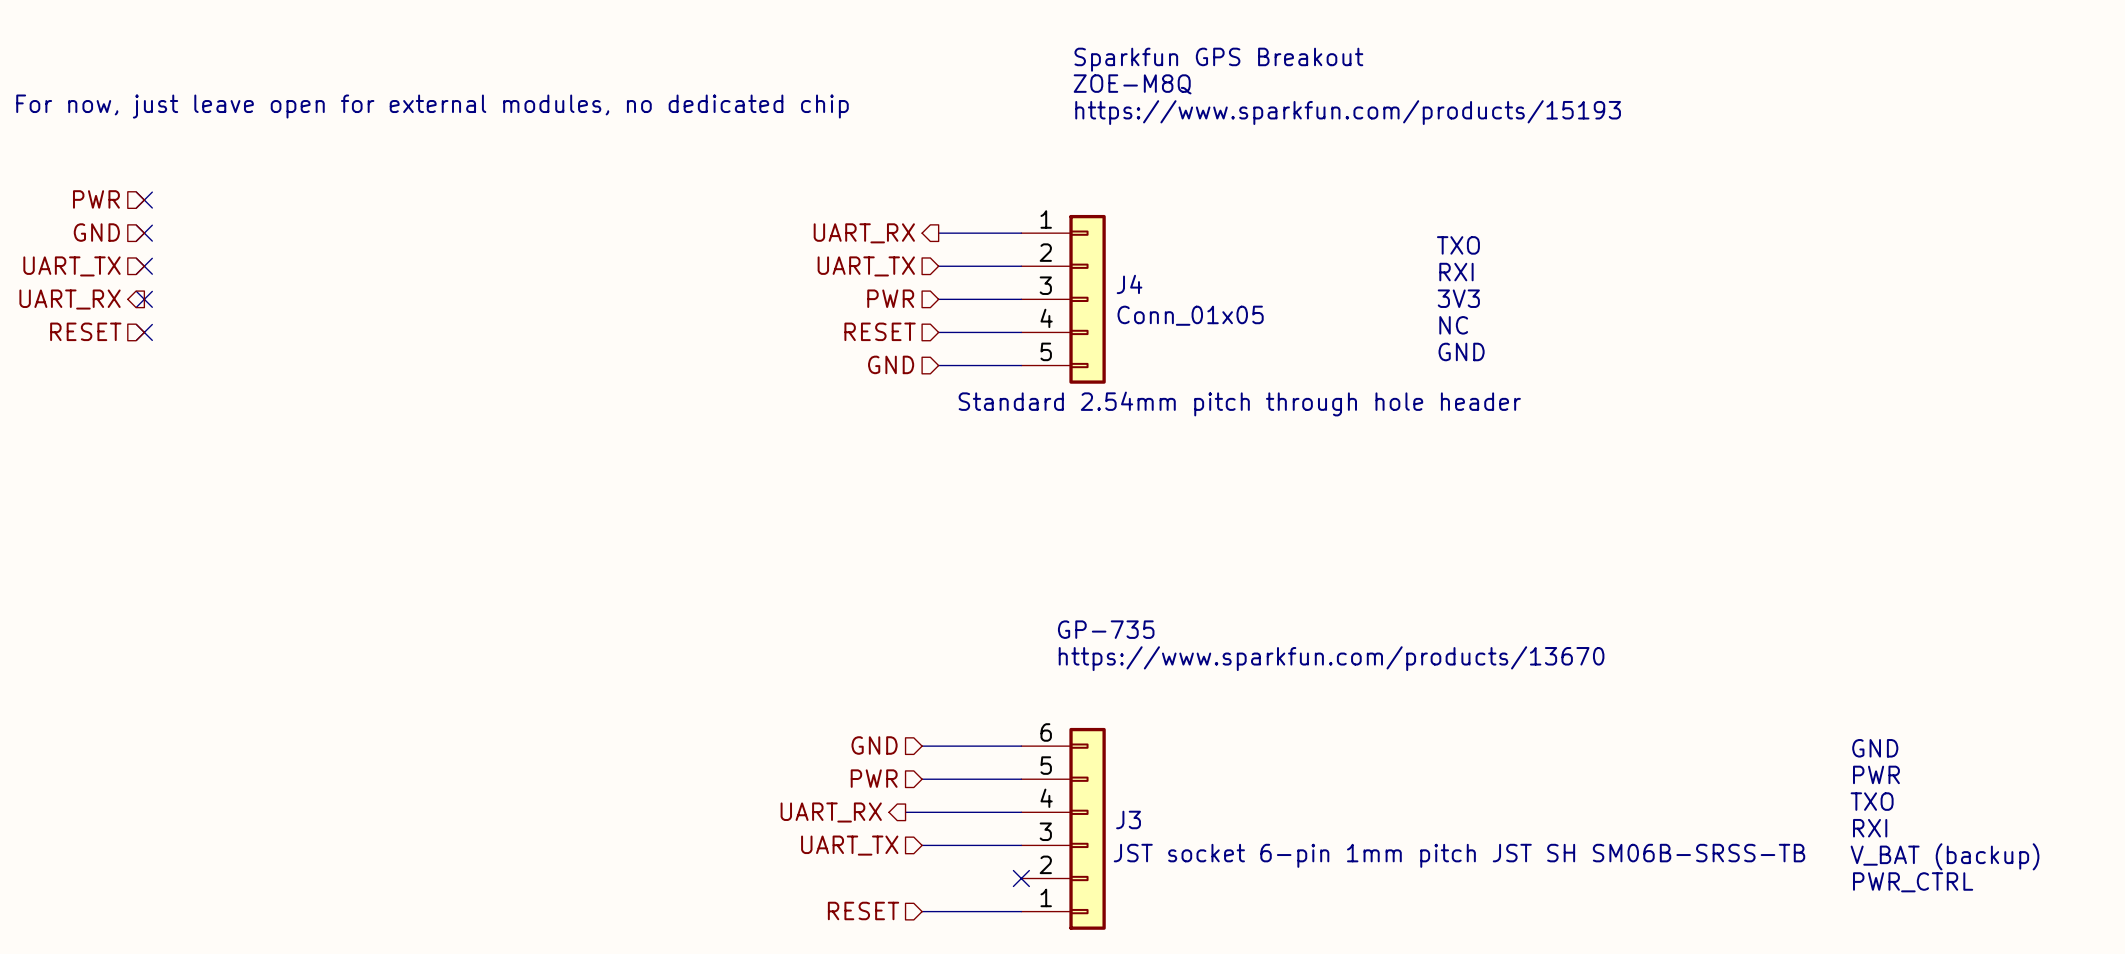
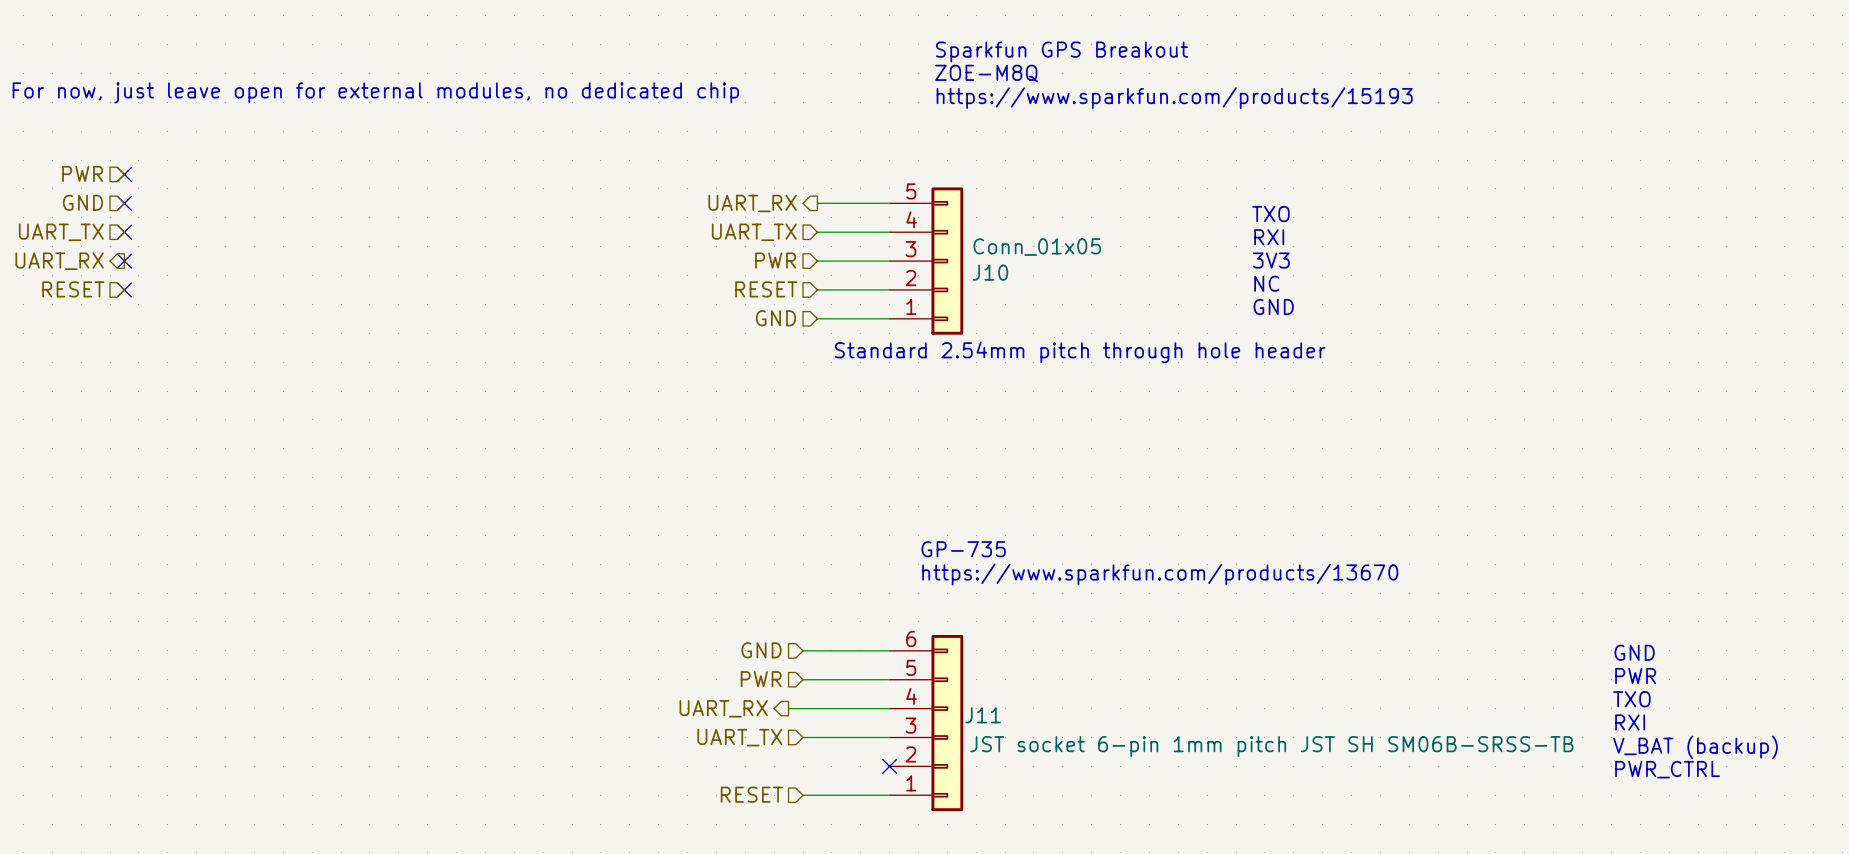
J4 name: J4 (1129, 284) -> J10 (990, 272)
J4 flip: as is (1087, 299) -> up-down (947, 261)
J3 name: J3 (1128, 819) -> J11 (983, 715)

